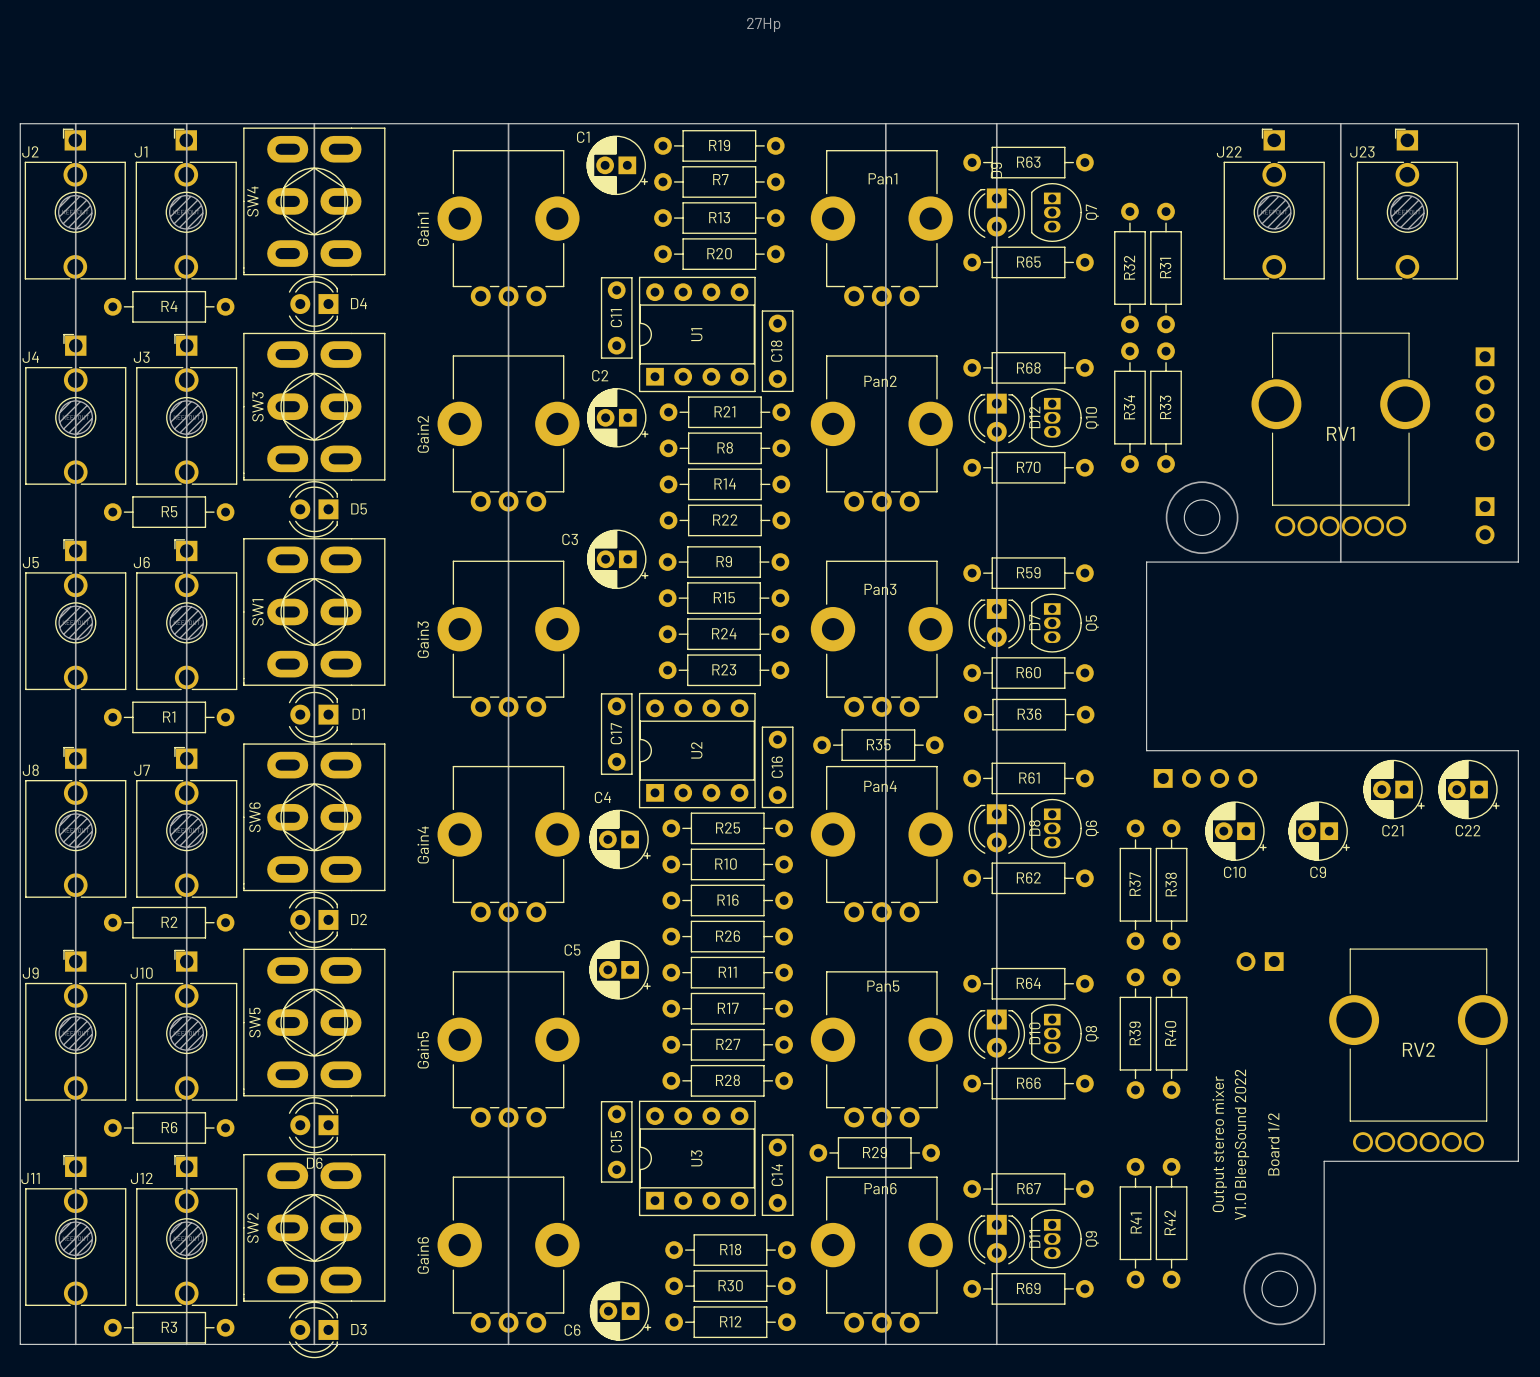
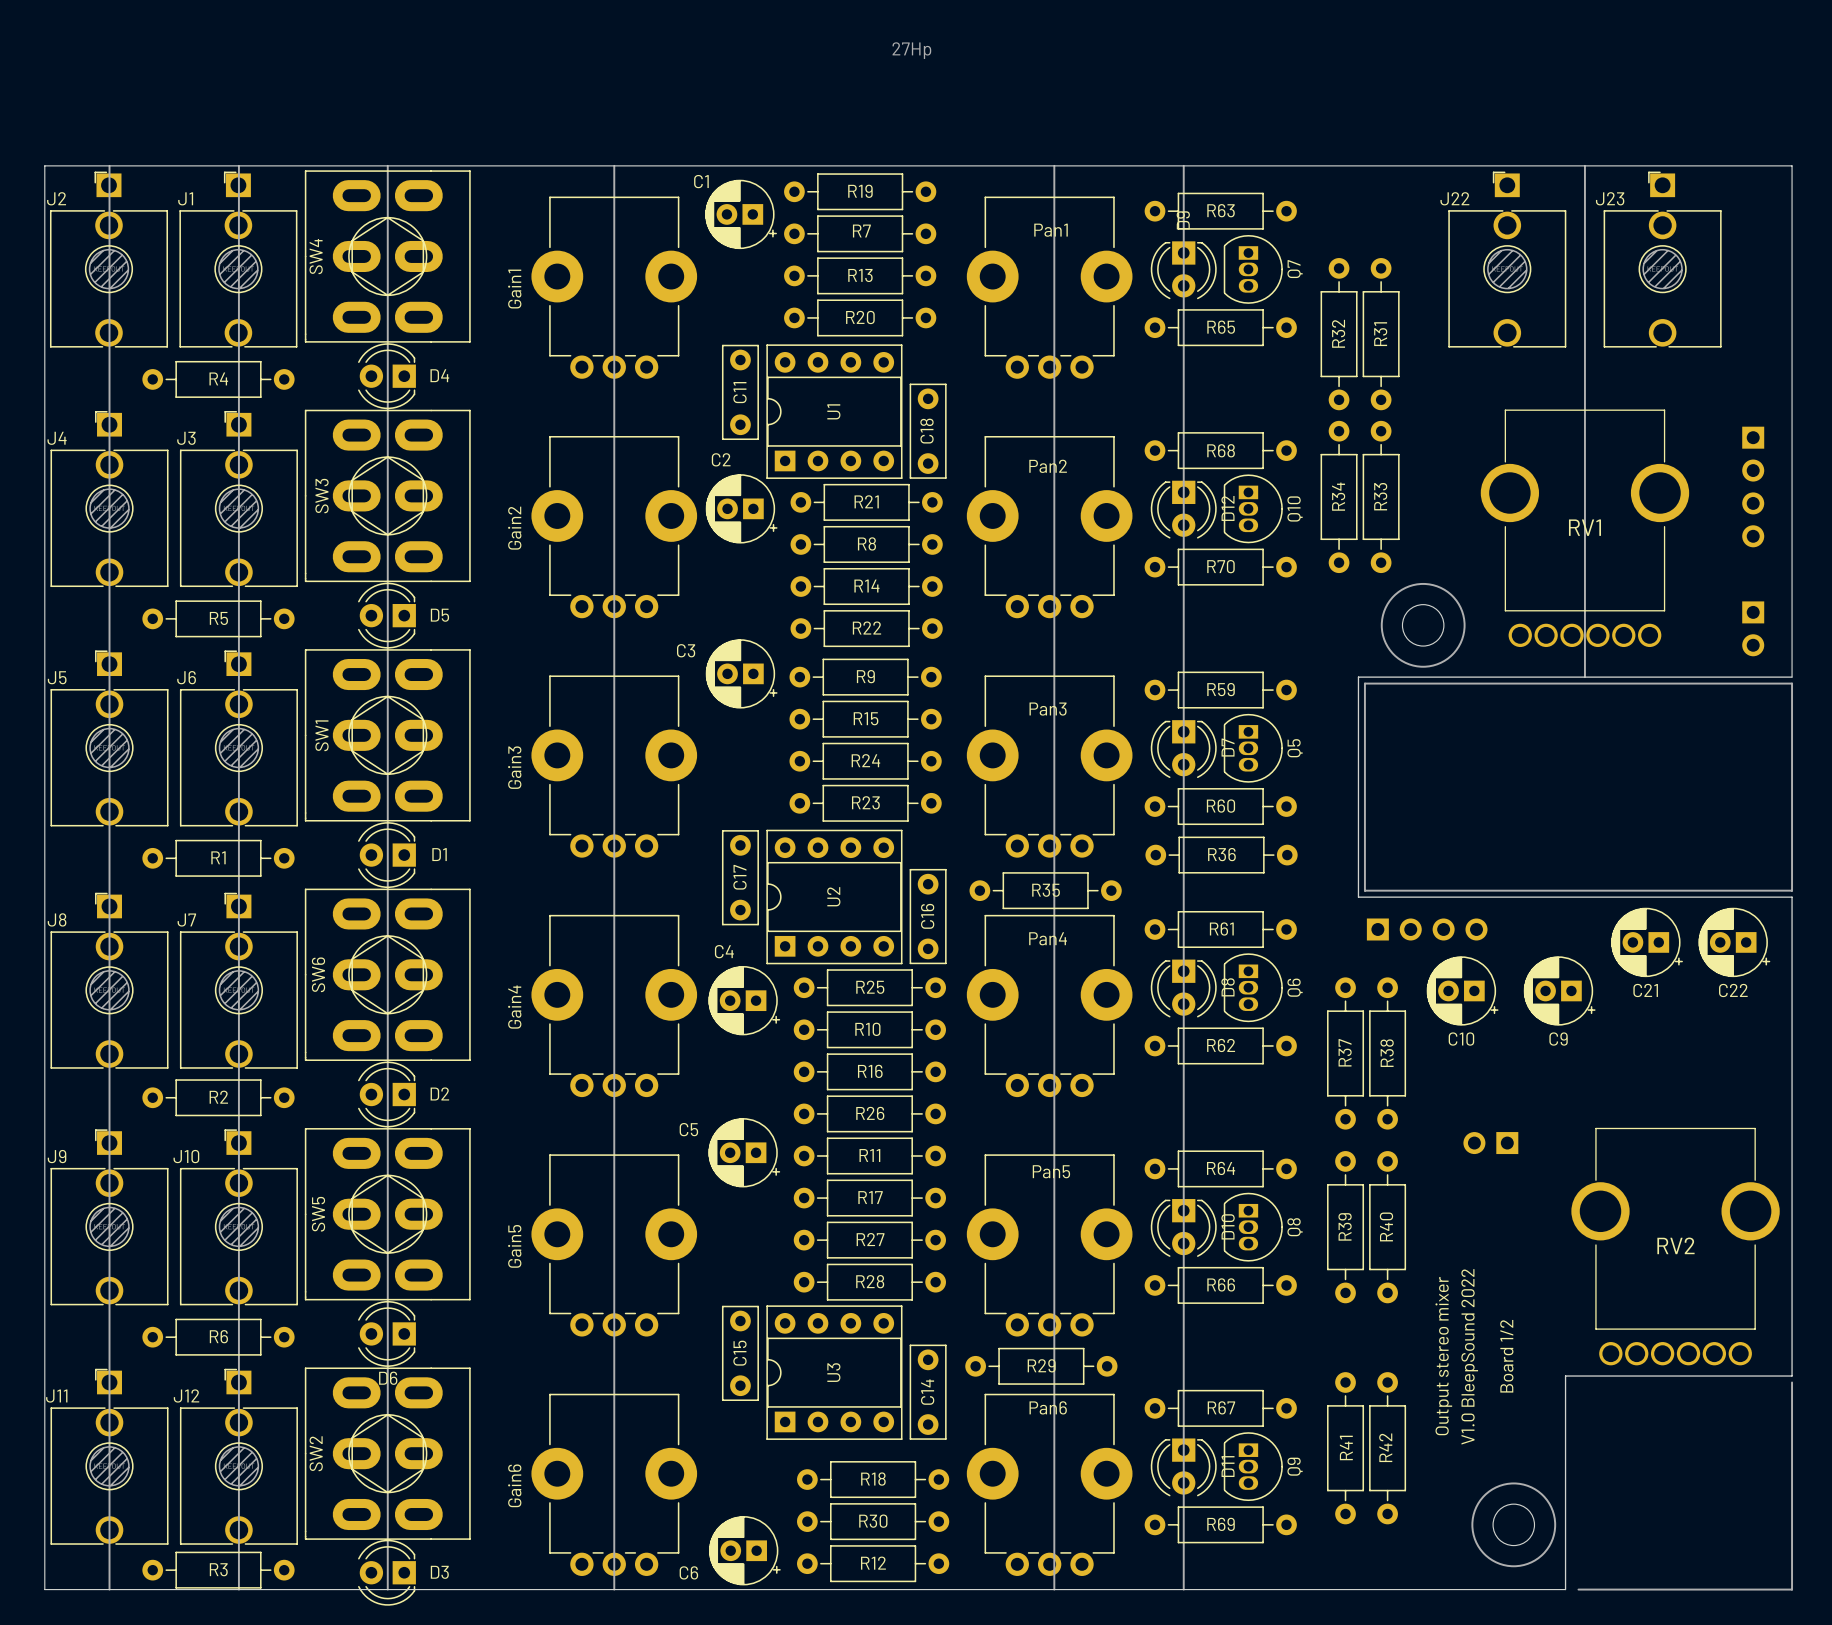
line: none -> (1364, 683) (1792, 683) (1792, 890) (1364, 890) (1364, 683)
line: none -> (1792, 1382) (1792, 1589) (1578, 1589)

